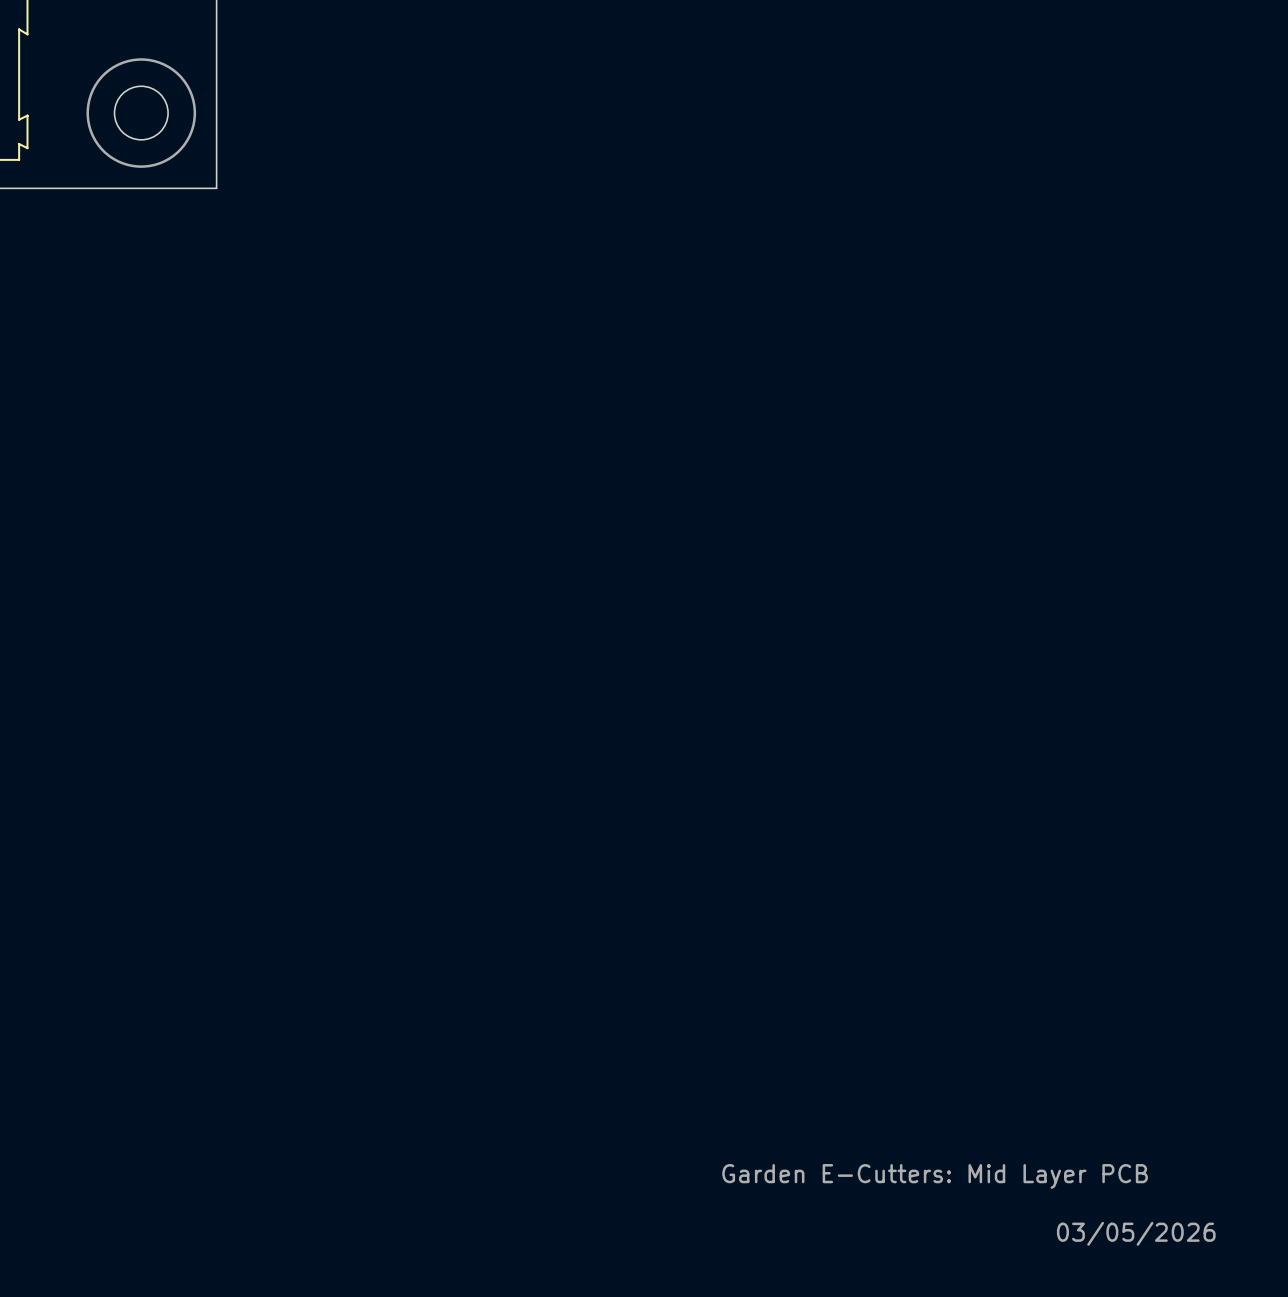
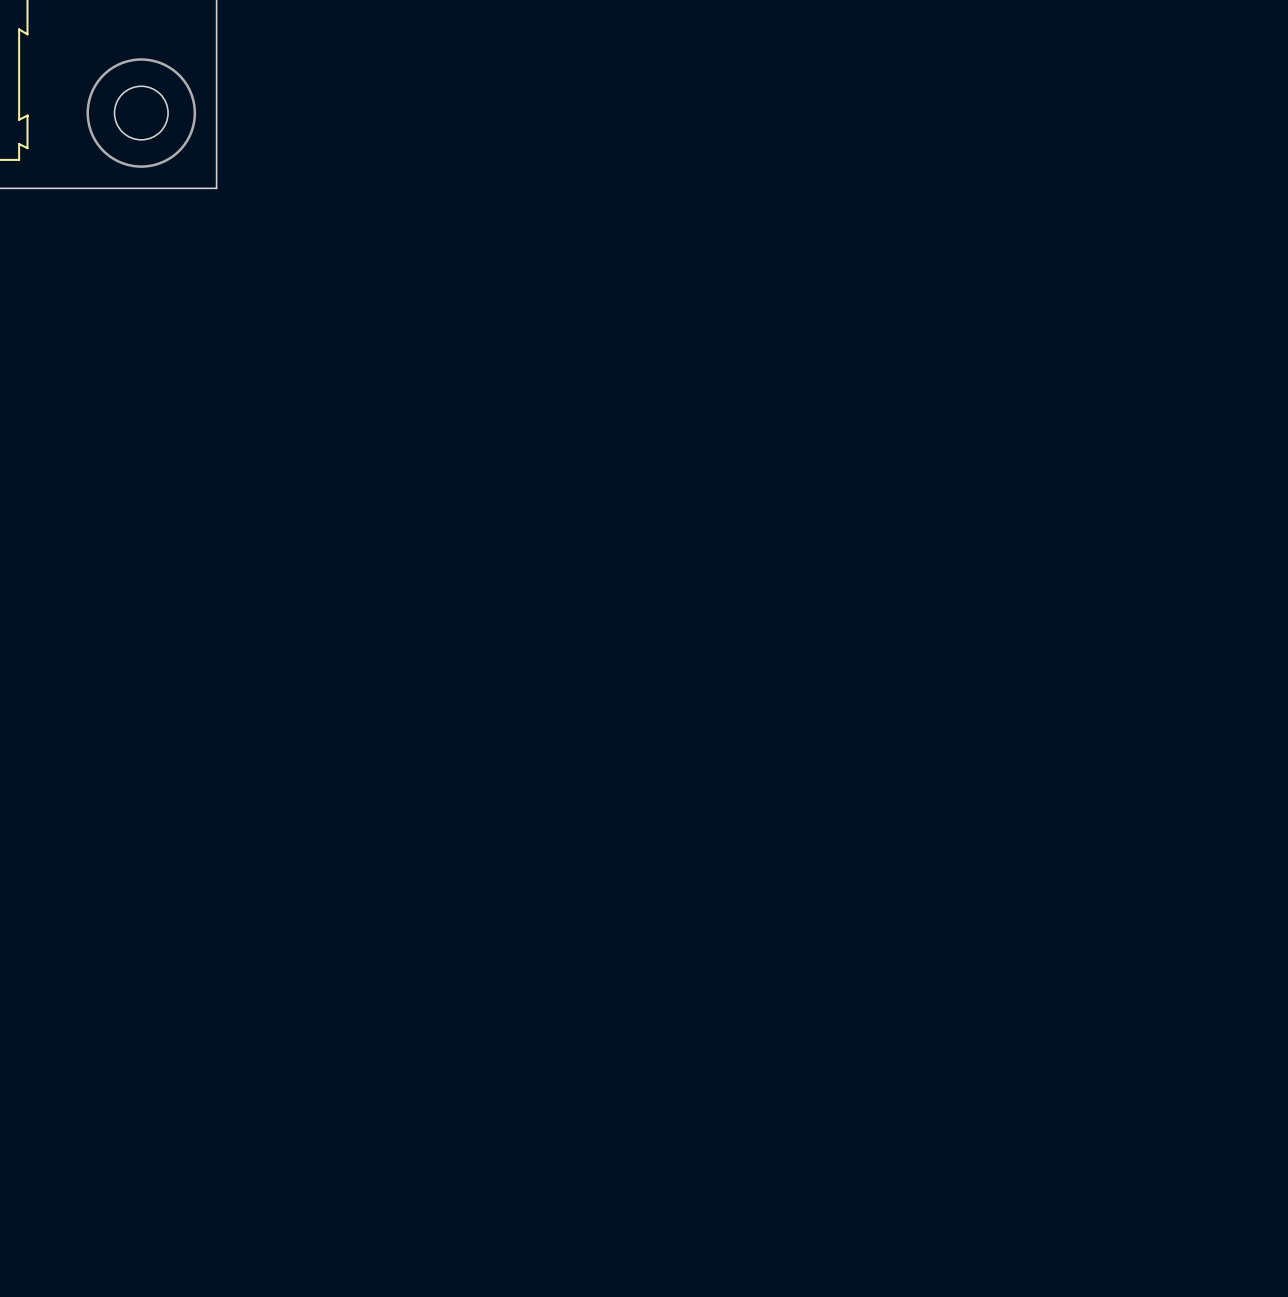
text: Garden E-Cutters: Mid Layer PCB (935, 1176) -> none
text: 03/05/2026 (1136, 1233) -> none

